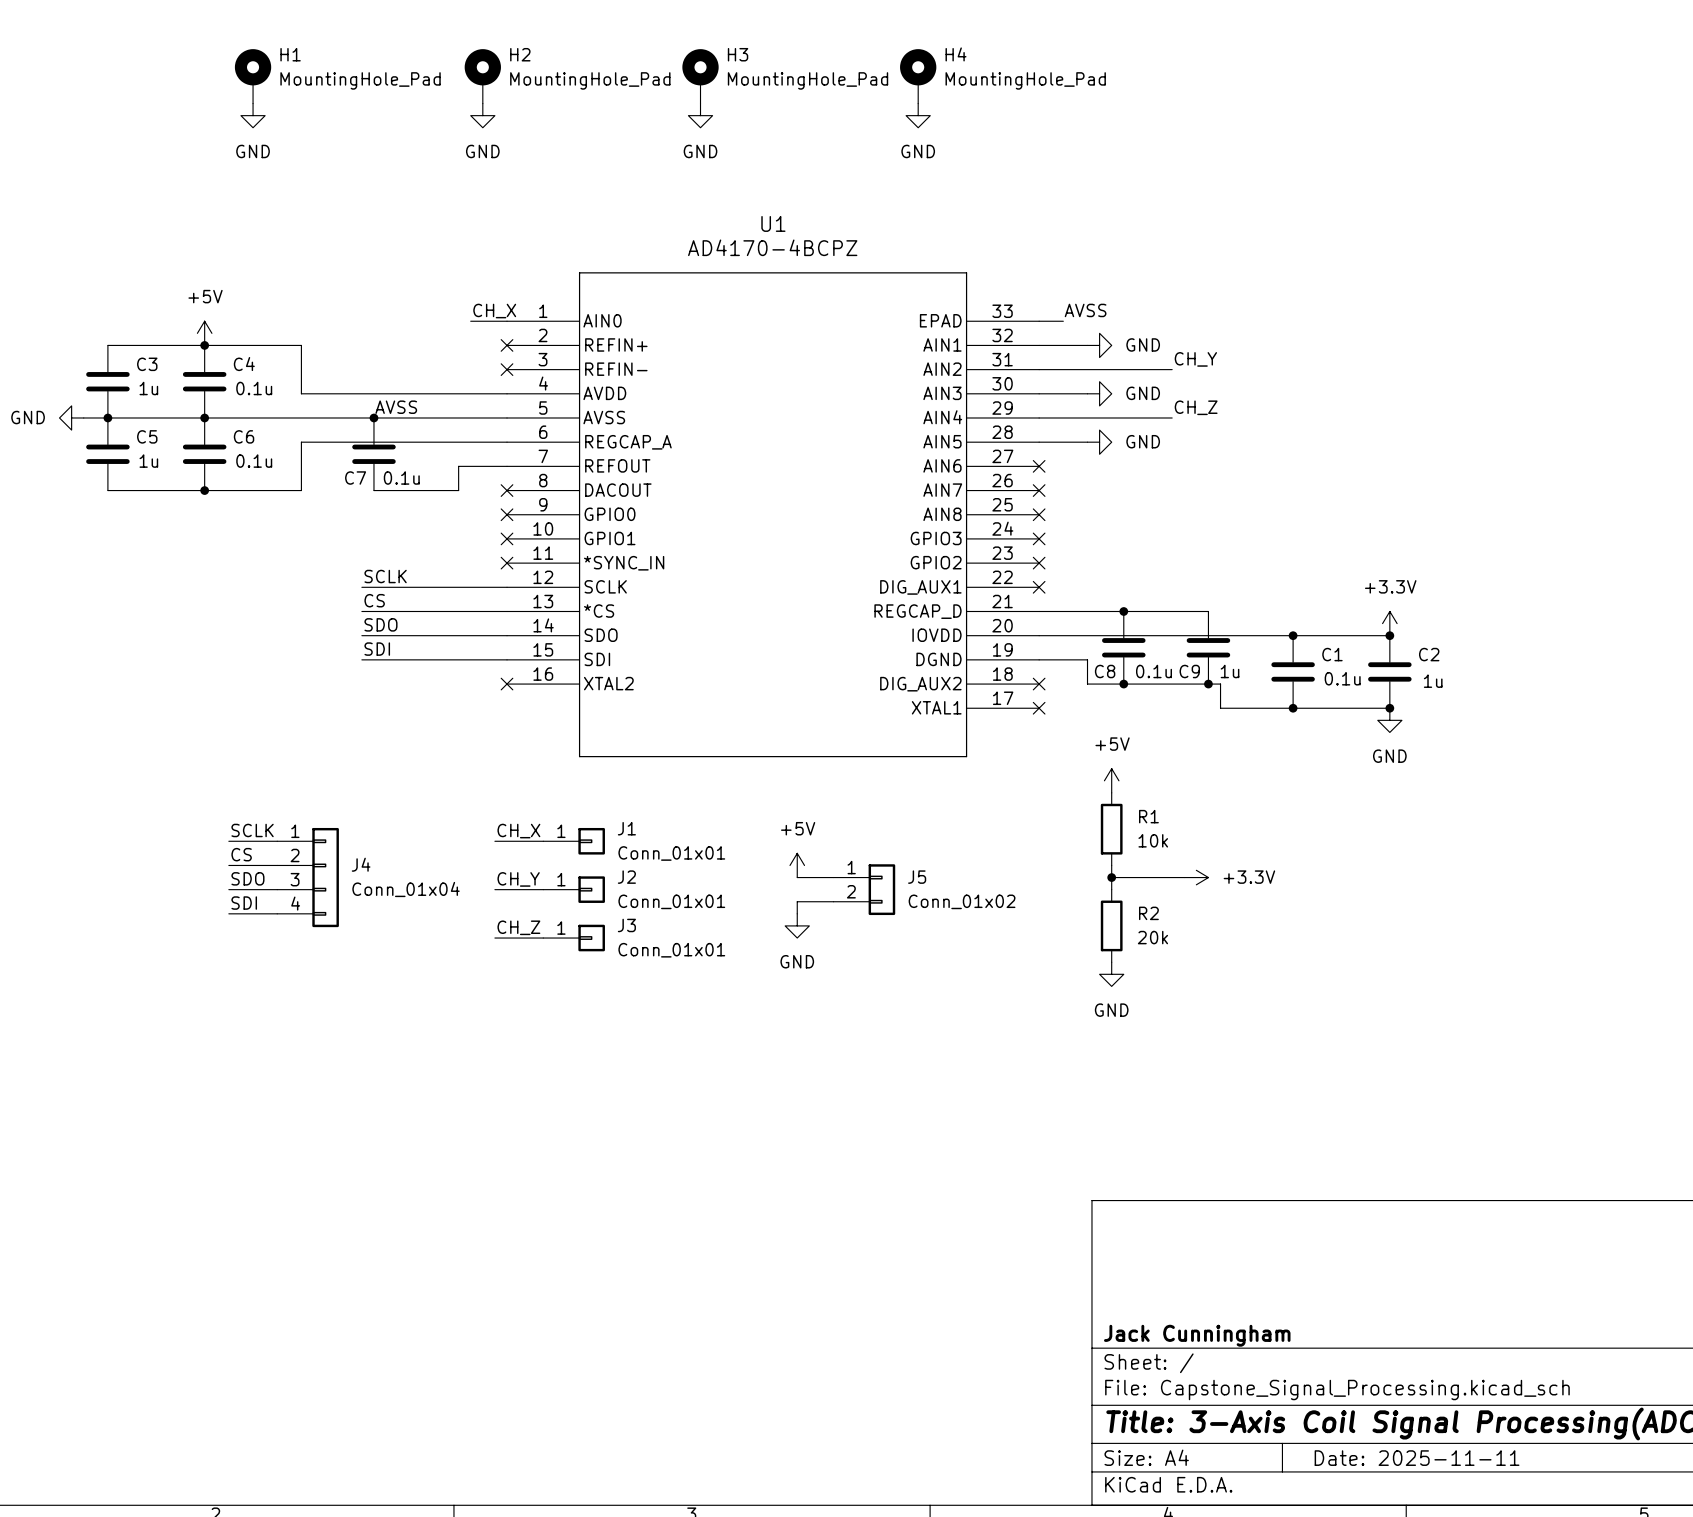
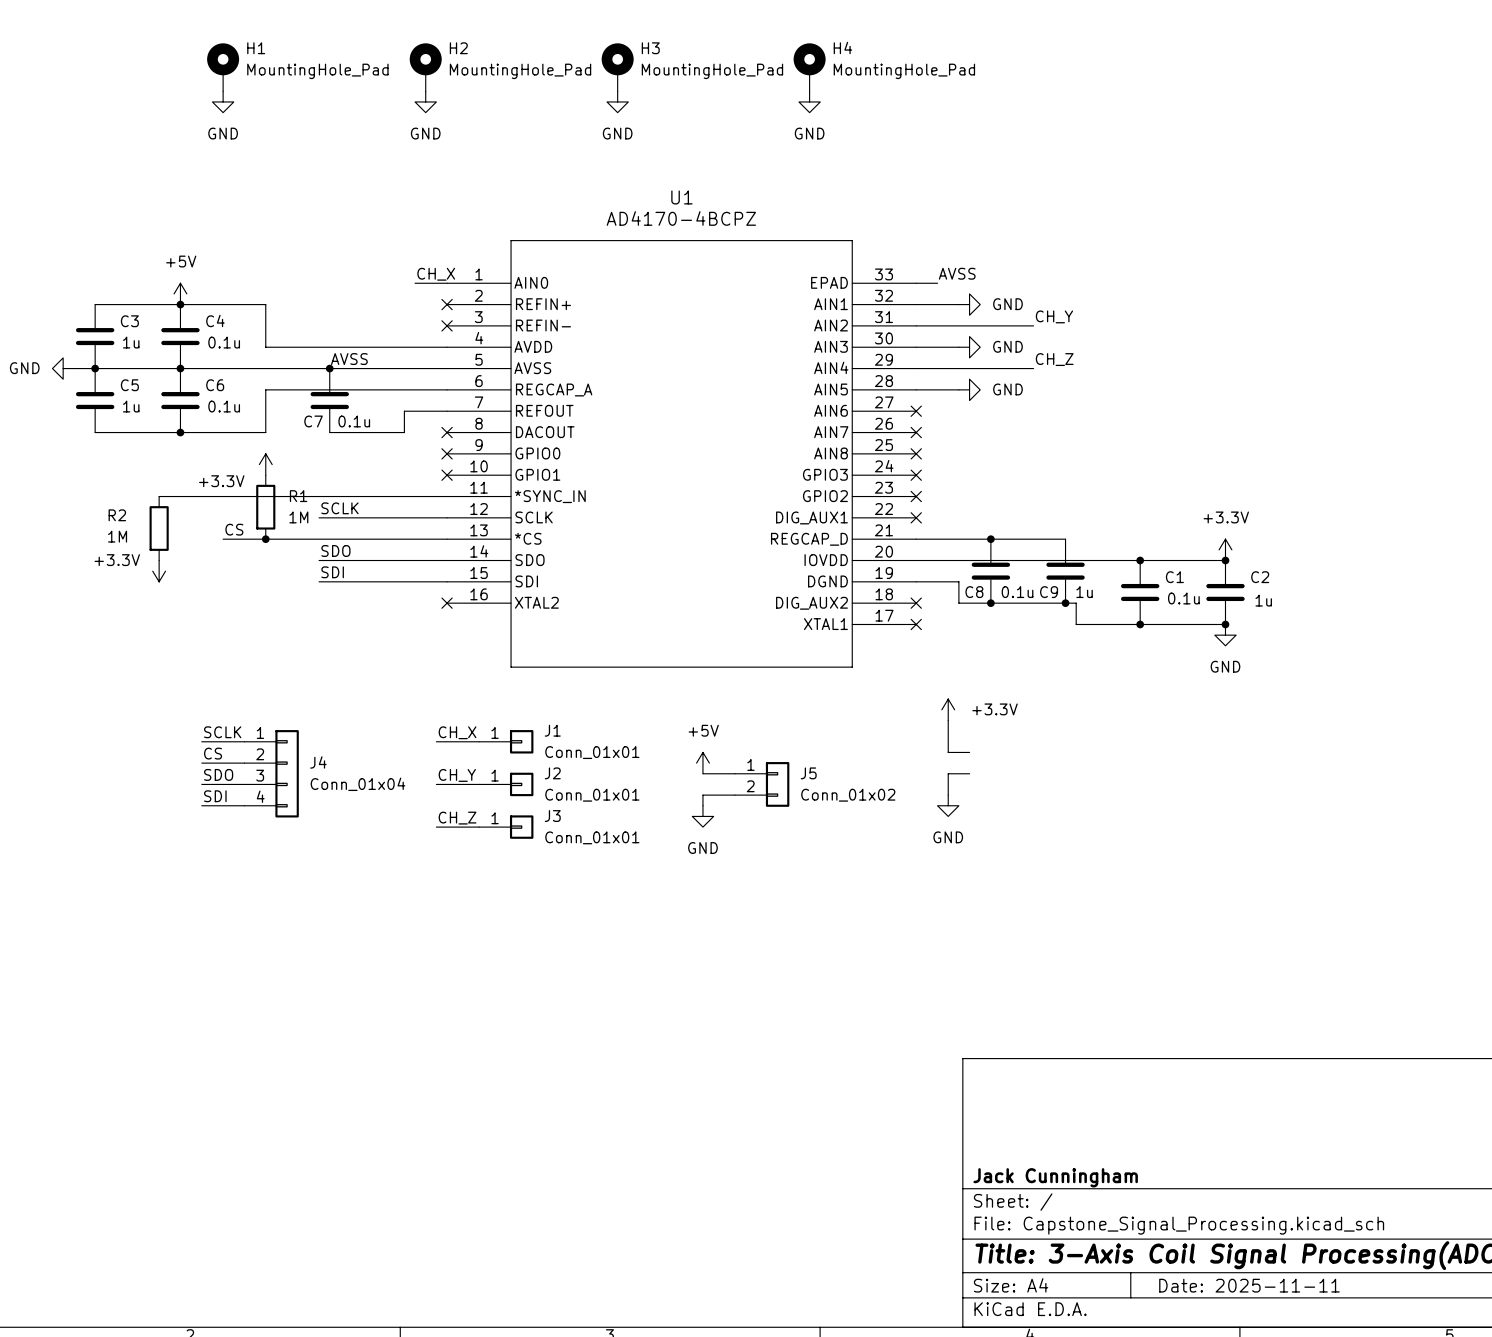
power symbol: none -> +3.3V (265, 464)
wire: none -> (159, 496) (447, 496)
no-connect mark: (507, 563) -> none
label position: CS (374, 600) -> CS (234, 529)
wire: none -> (223, 539) (319, 539)
junction: none -> (265, 539)
power symbol: none -> +3.3V (159, 571)
power symbol: +5V (1111, 780) -> none
wire: none -> (948, 720) (948, 752) (969, 752)
R1 position: (1111, 829) -> (265, 507)
R1 value: 10k (1153, 840) -> 1M (298, 517)
wire: (1111, 865) (1111, 889) -> none
wire: none -> (969, 773) (948, 773) (948, 795)
wire: (1111, 877) (1184, 877) -> none
junction: (1111, 877) -> none
power symbol rotation: 0° (1196, 877) -> 90° counterclockwise (948, 709)
power symbol position: +3.3V (1196, 877) -> +3.3V (948, 709)
R2 name position: R2 (1148, 913) -> R2 (117, 515)
R2 position: (1111, 925) -> (159, 528)
R2 value: 20k (1152, 937) -> 1M (117, 536)
power symbol position: GND (1111, 974) -> GND (948, 805)

